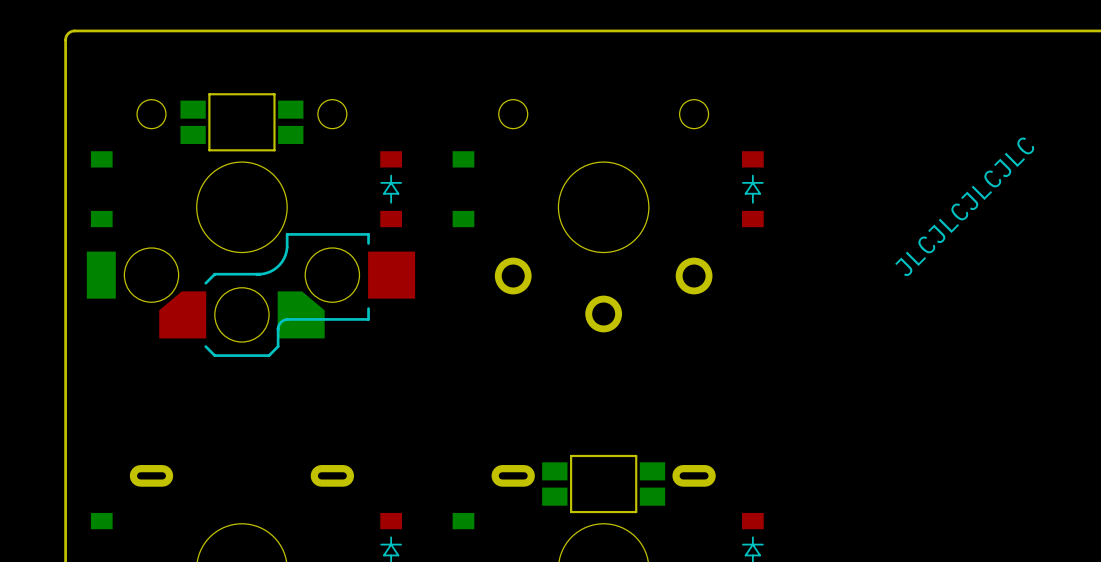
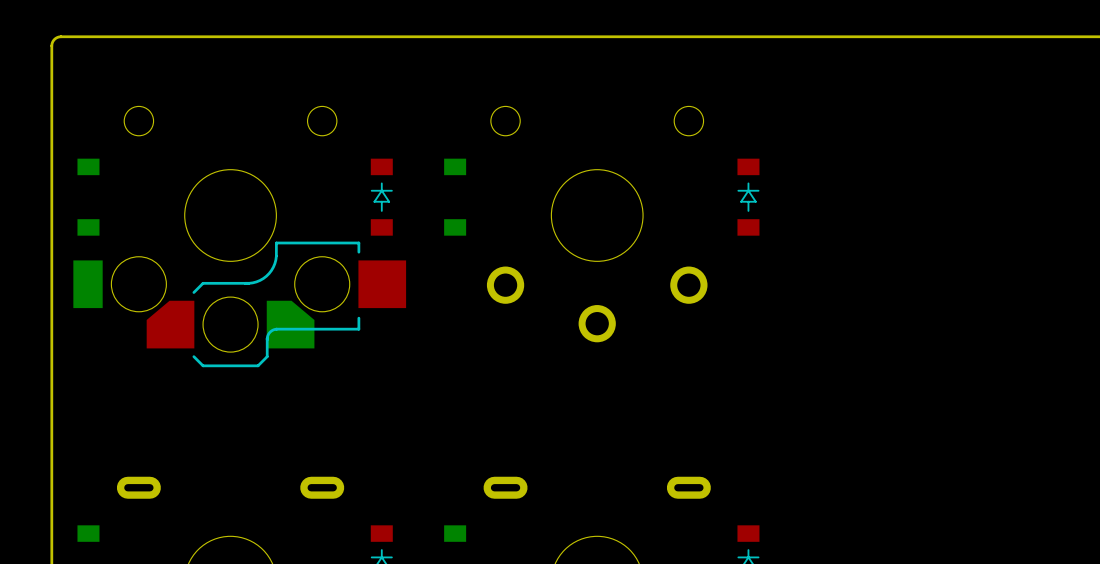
part: (241, 122) -> none
text: JLCJLCJLCJLC (964, 206) -> none
part: (603, 484) -> none

